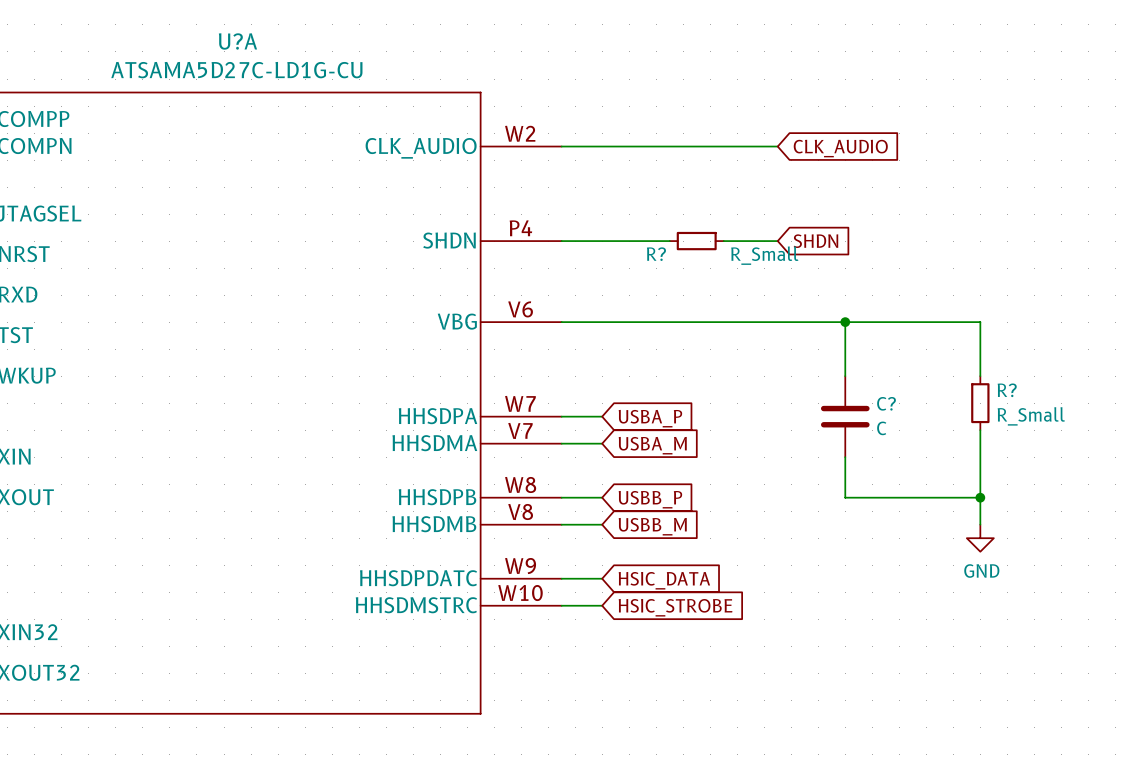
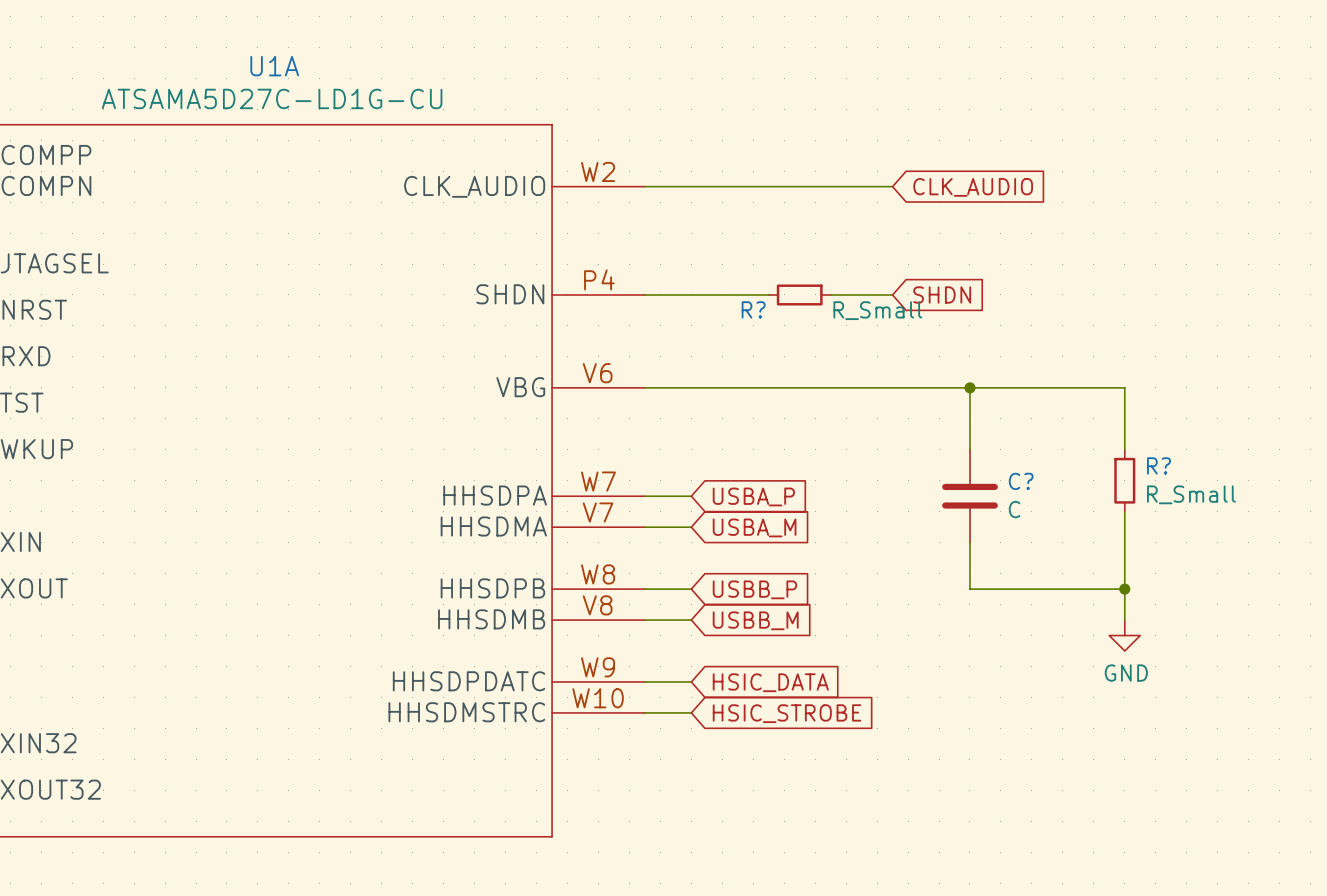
U?A name: U?A (237, 41) -> U1A (274, 66)

